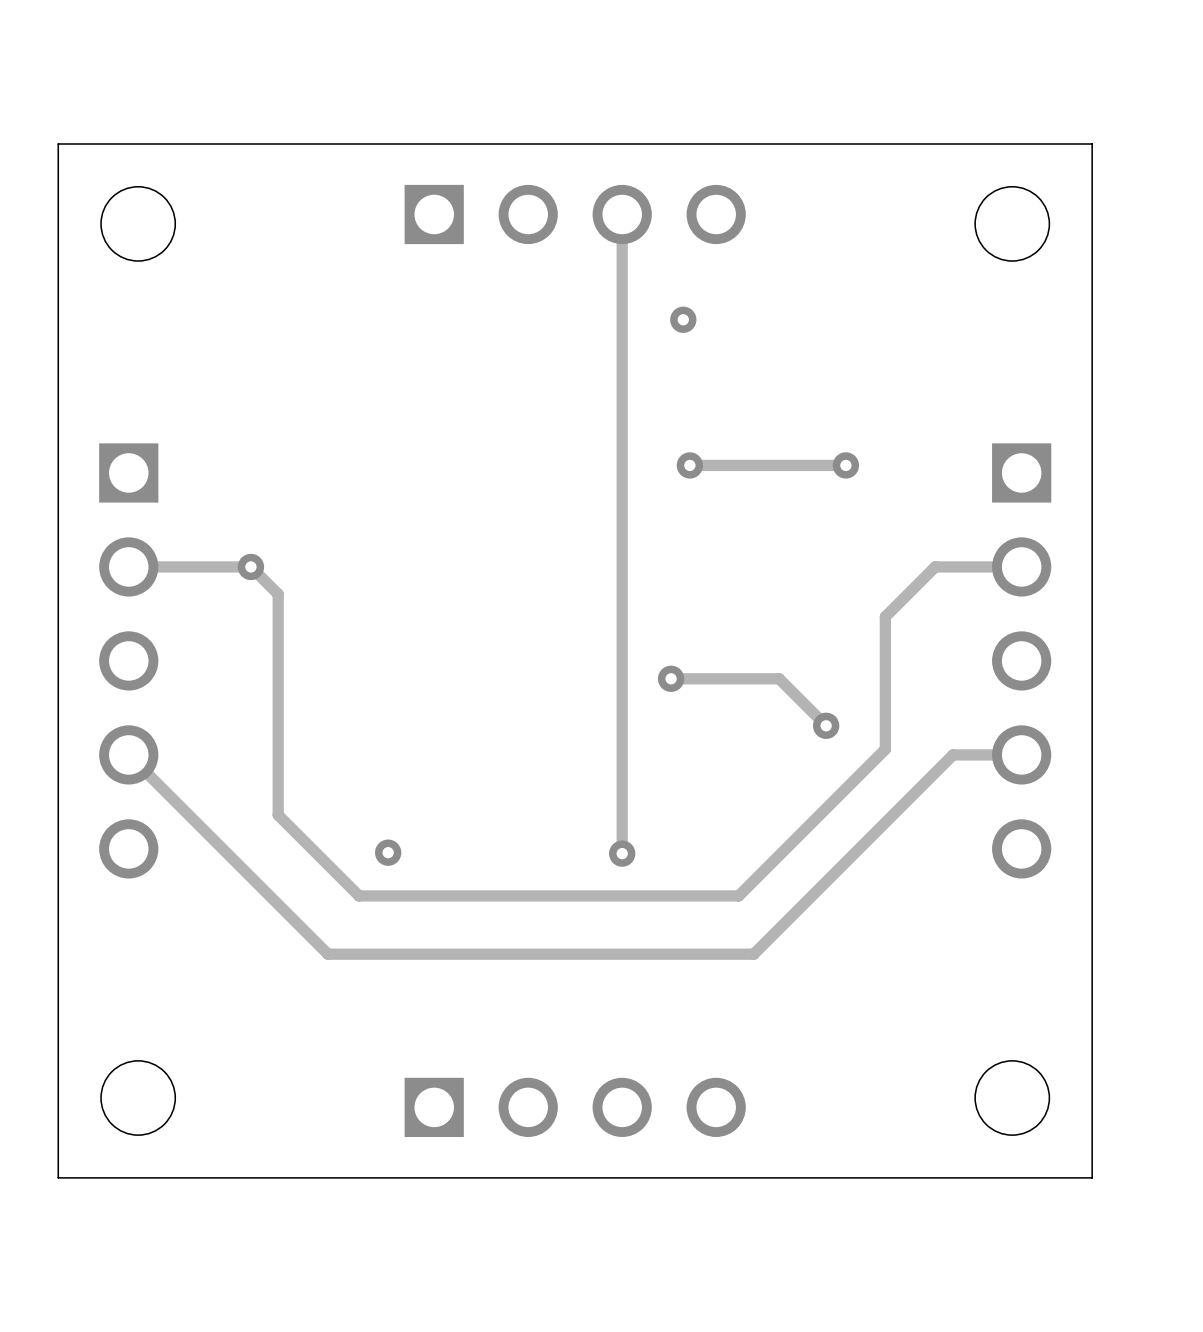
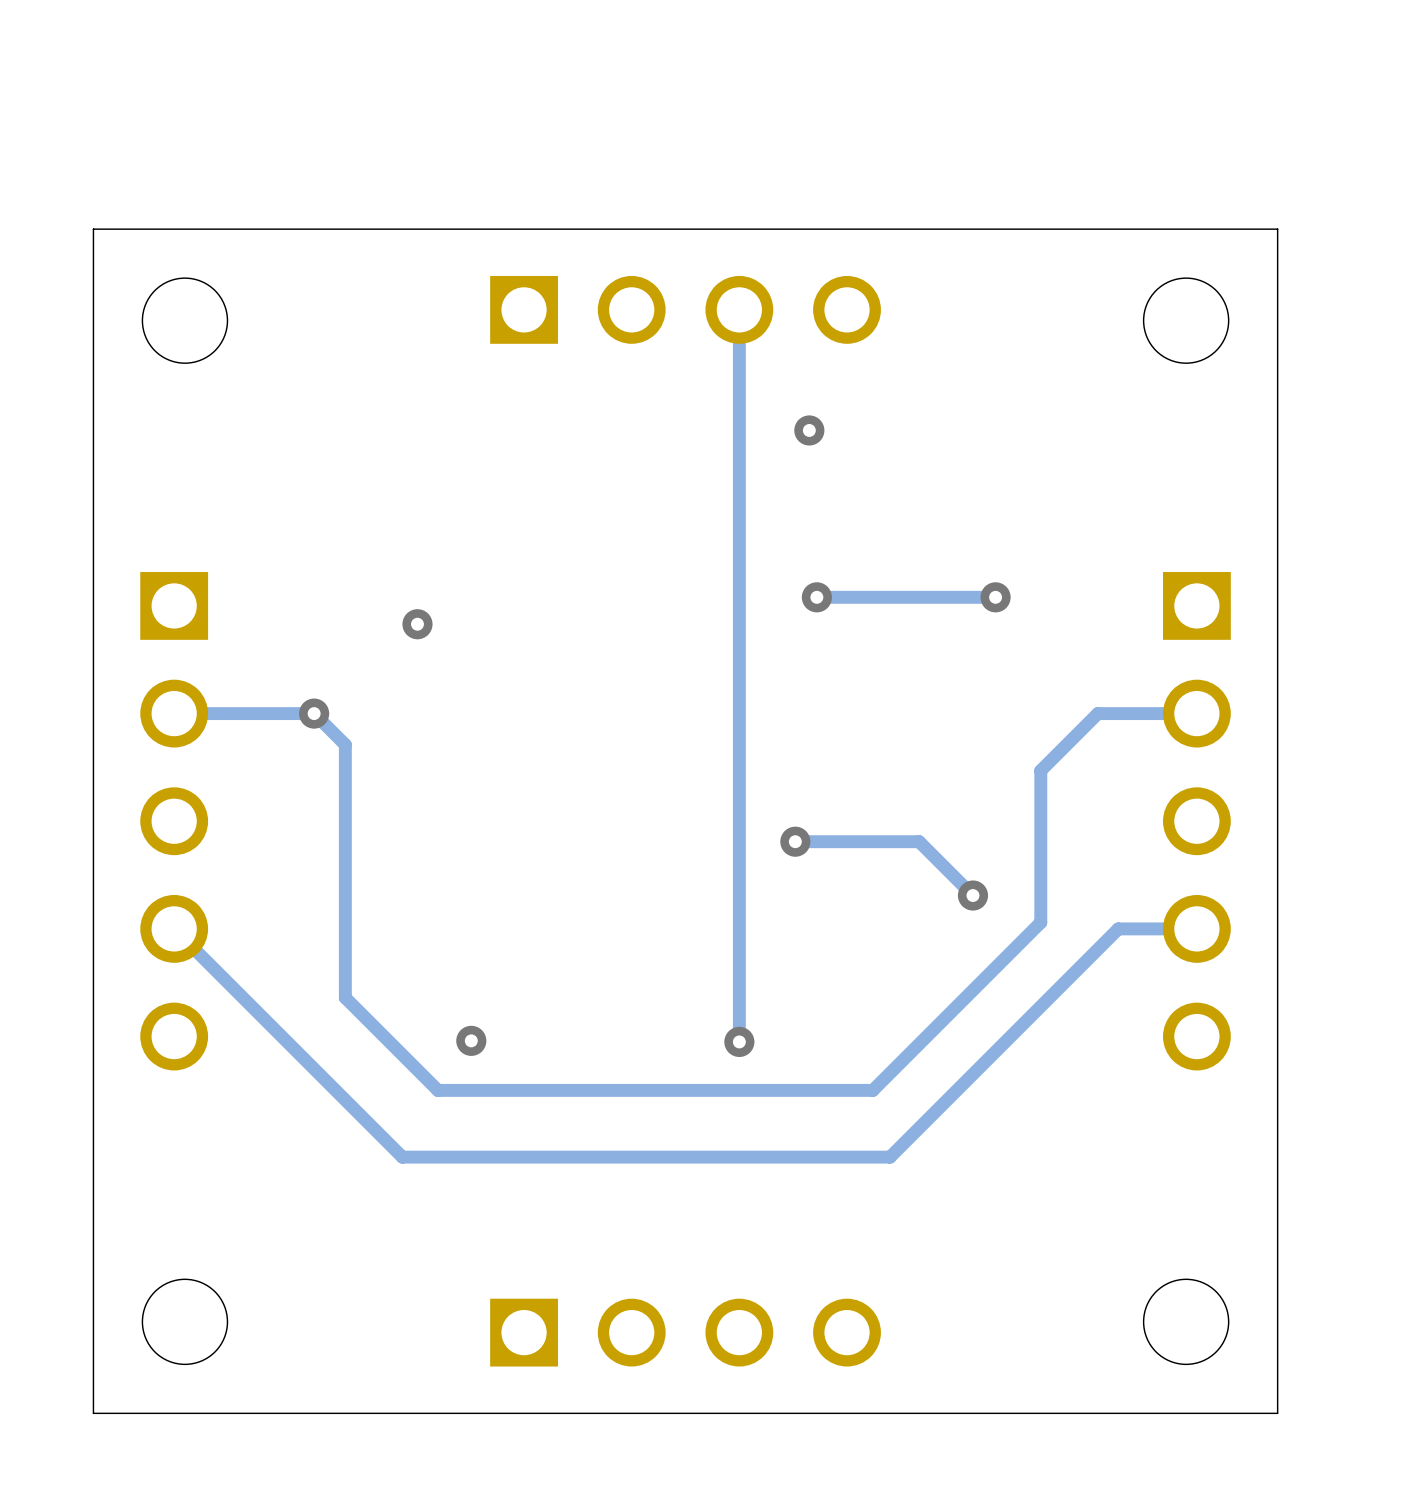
via: none -> (417, 624)

